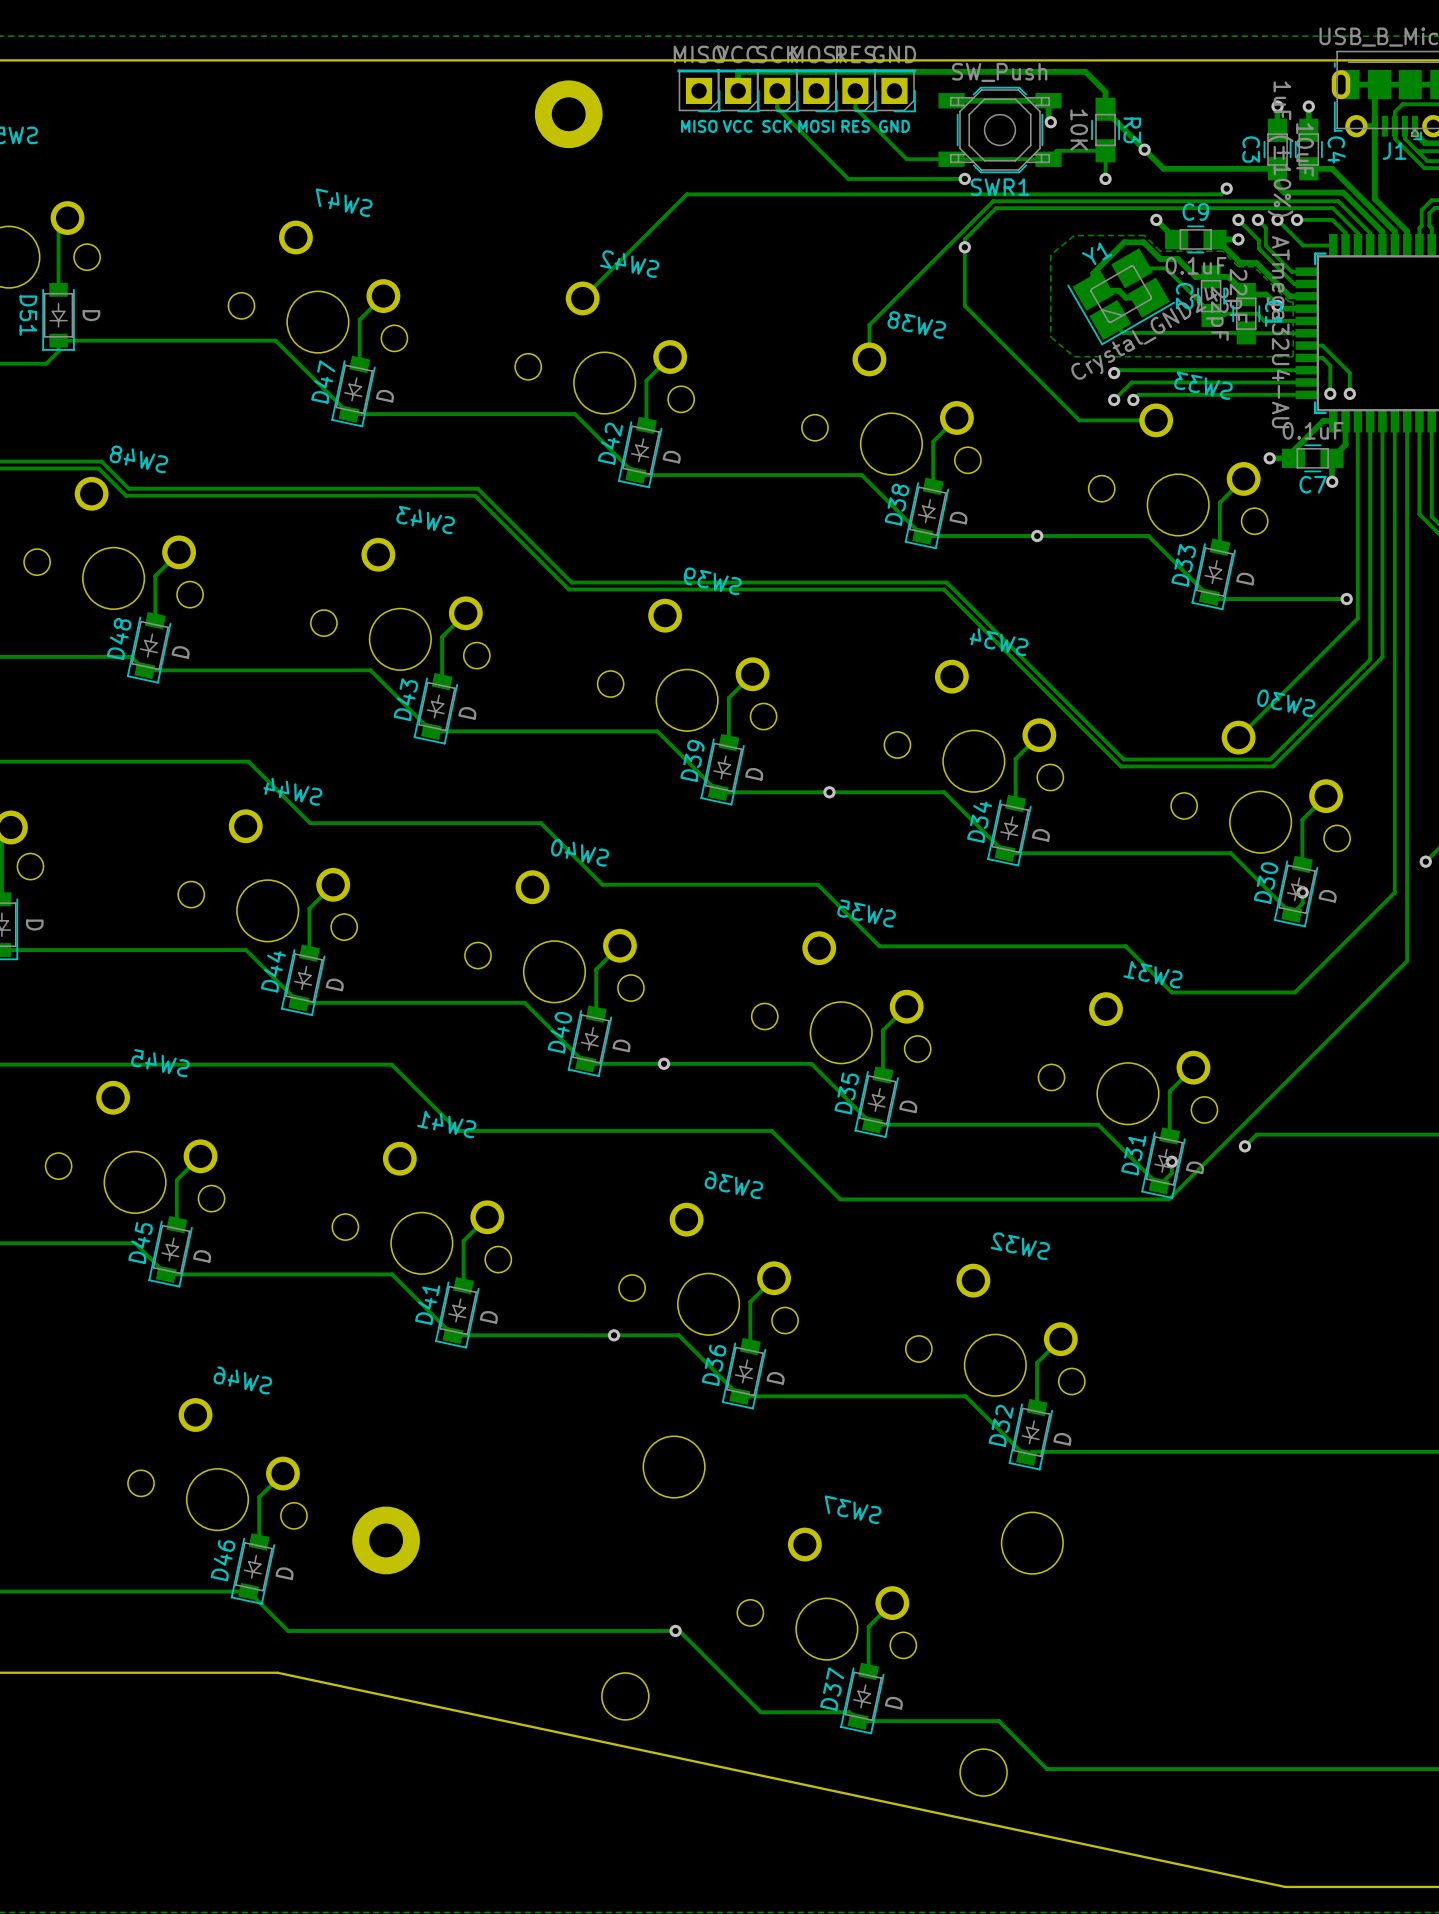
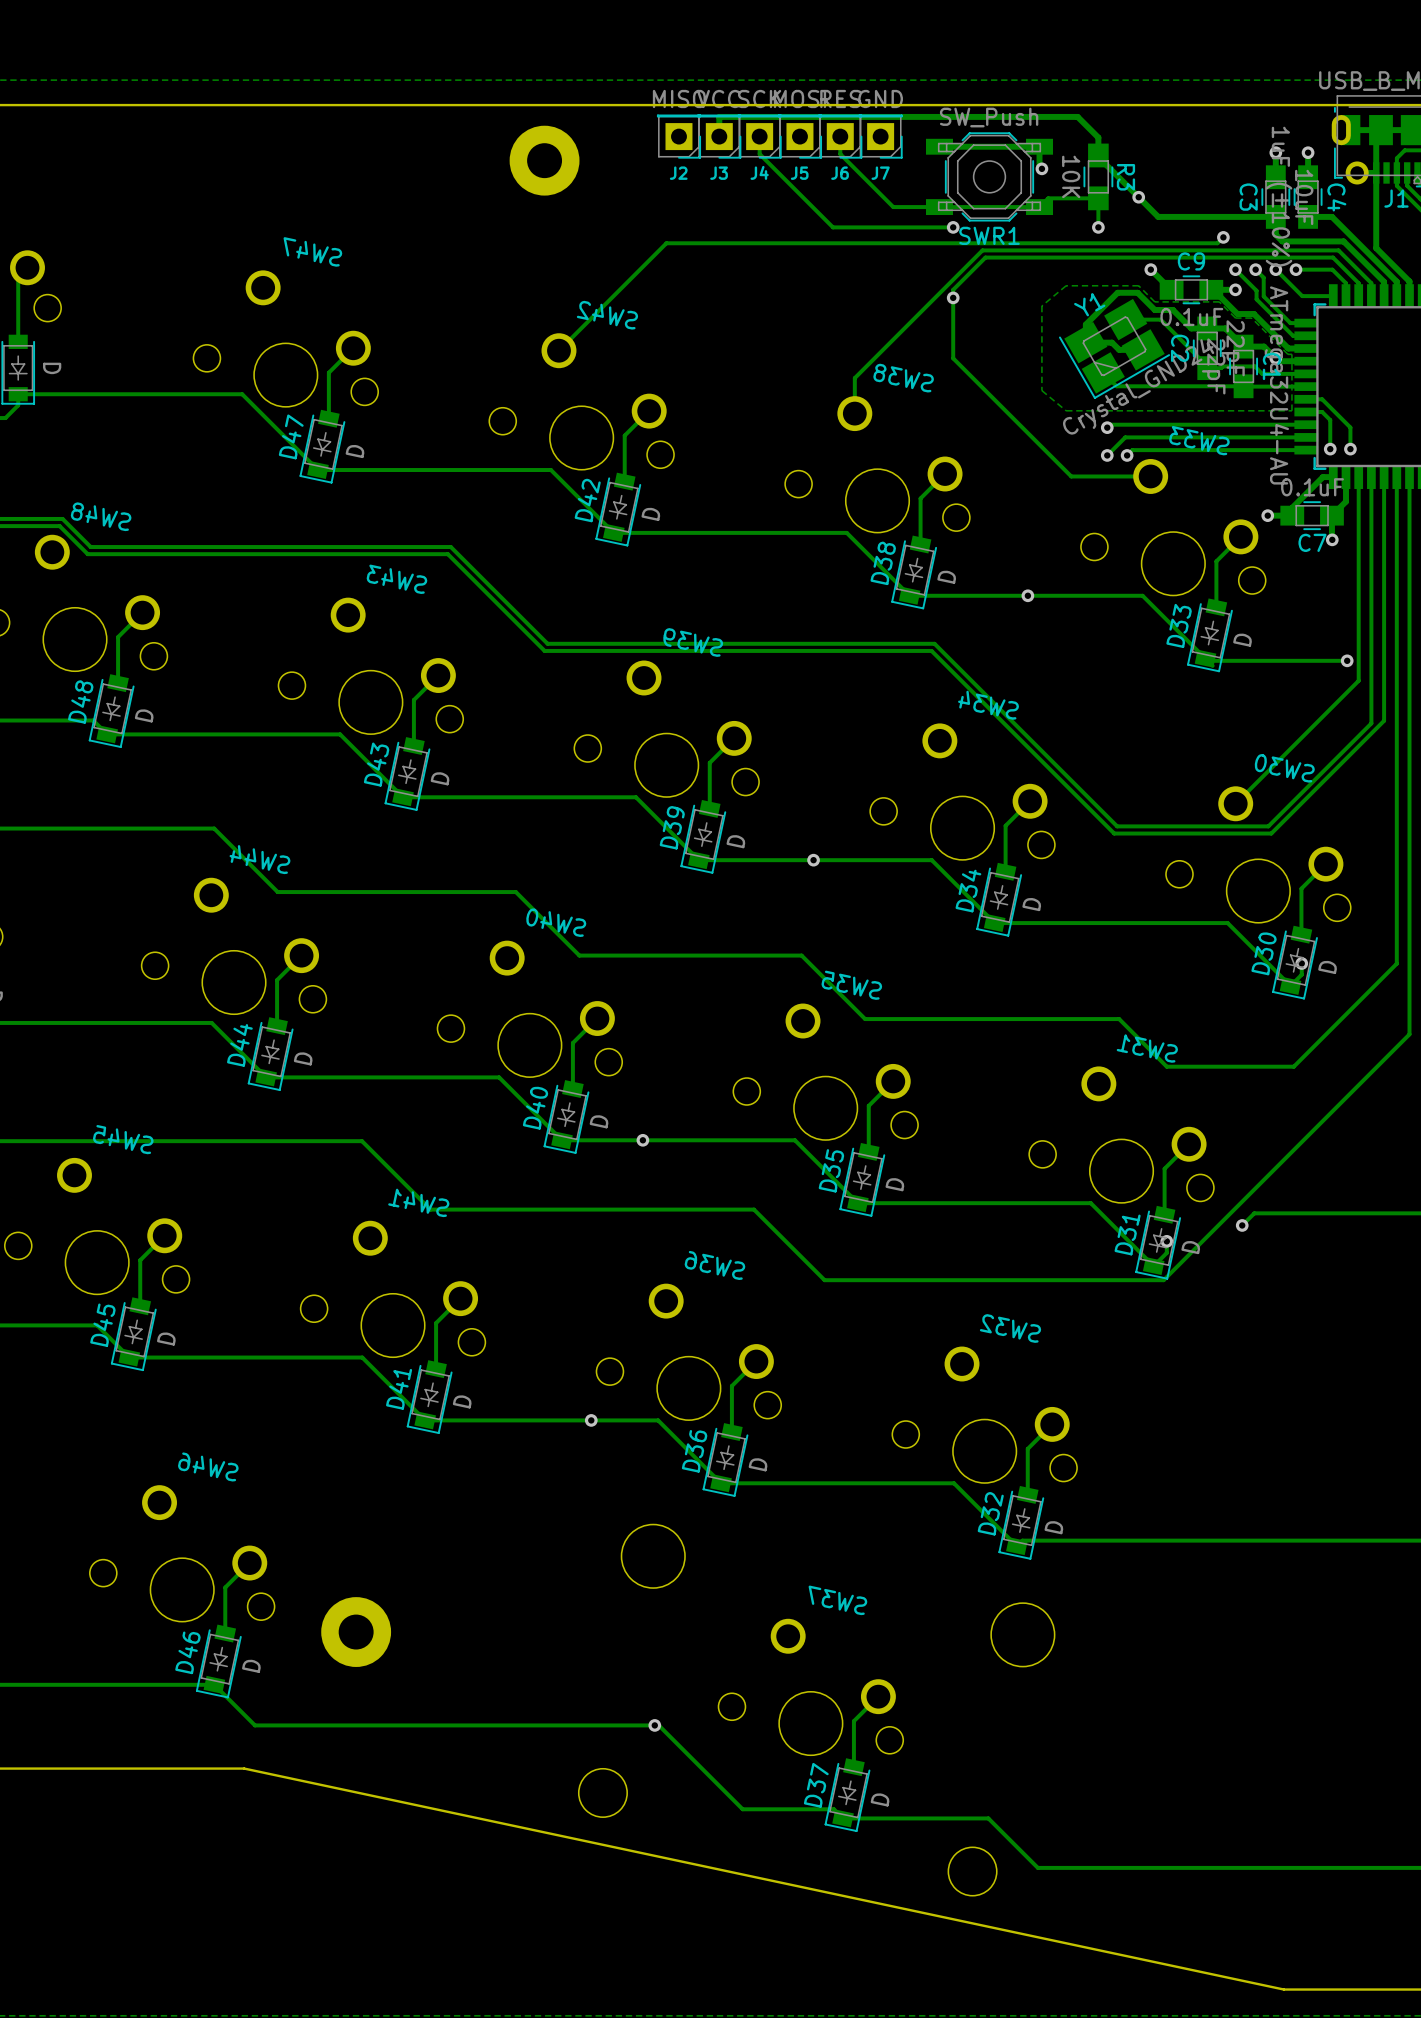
MISO name: MISO (699, 126) -> J2 (678, 173)
VCC name: VCC (737, 126) -> J3 (719, 173)
SCK name: SCK (777, 126) -> J4 (759, 172)
MOSI name: MOSI (816, 126) -> J5 (799, 173)
RES name: RES (855, 126) -> J6 (840, 173)
GND name: GND (894, 126) -> J7 (880, 173)

